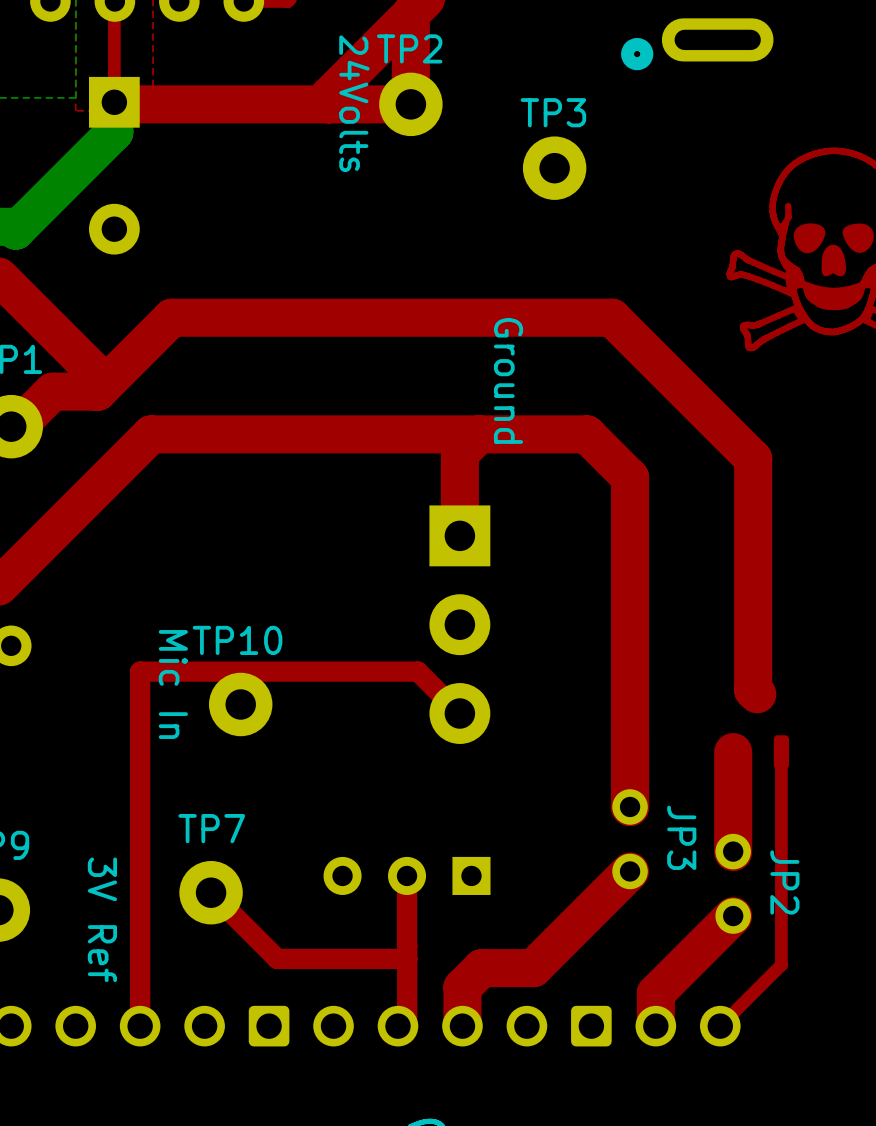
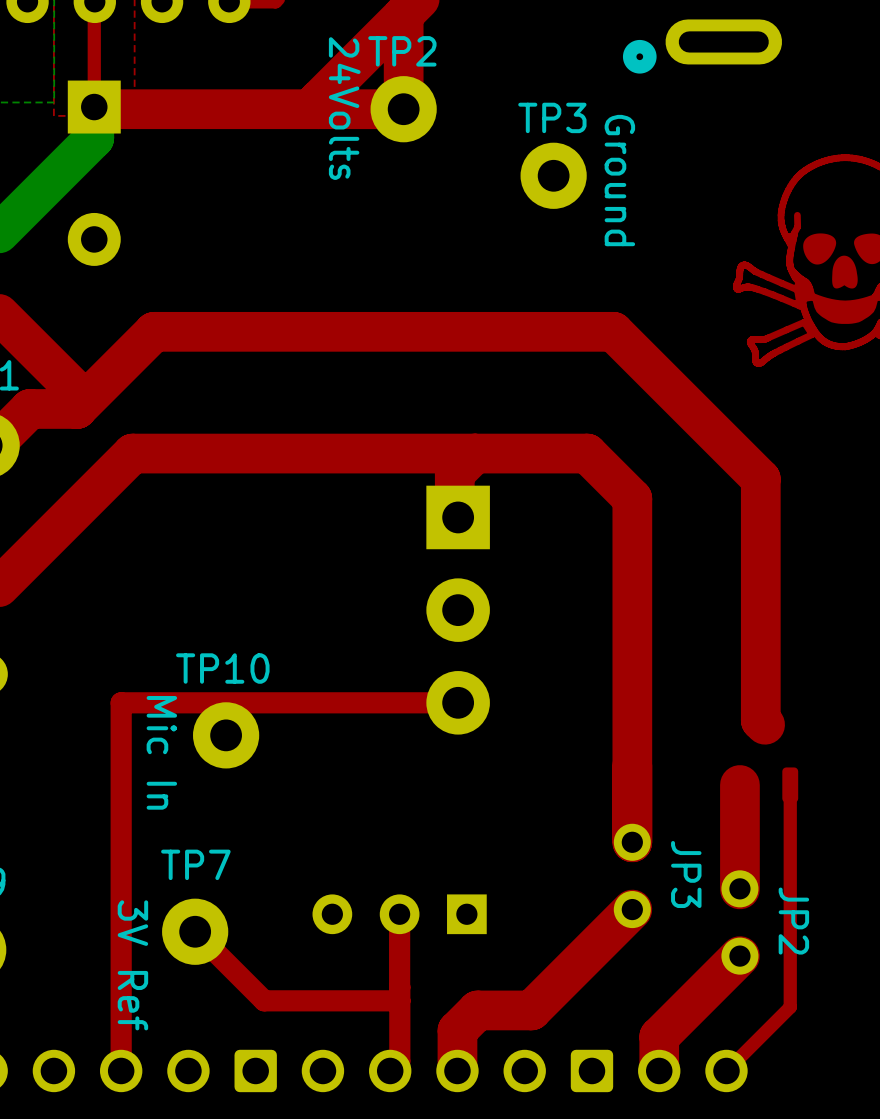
text position: Ground (508, 380) -> Ground (619, 180)
part position: (459, 624) -> (458, 610)
top track: (140, 673) (140, 671) (417, 671) (459, 713) -> (121, 702) (458, 702)
text position: Mic In (173, 684) -> Mic In (161, 752)
text position: 3V Ref (102, 919) -> 3V Ref (132, 965)

